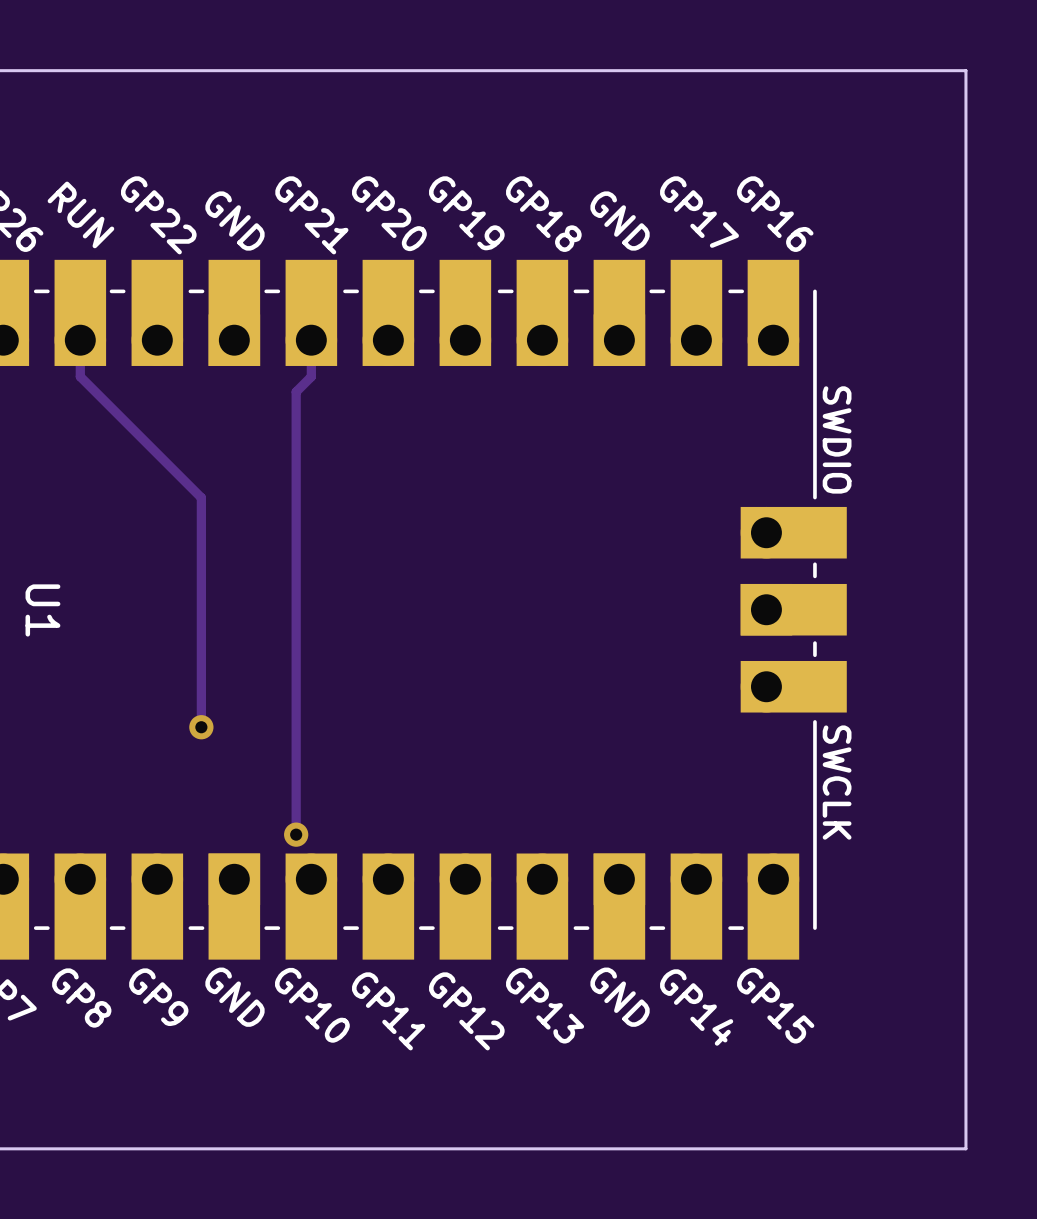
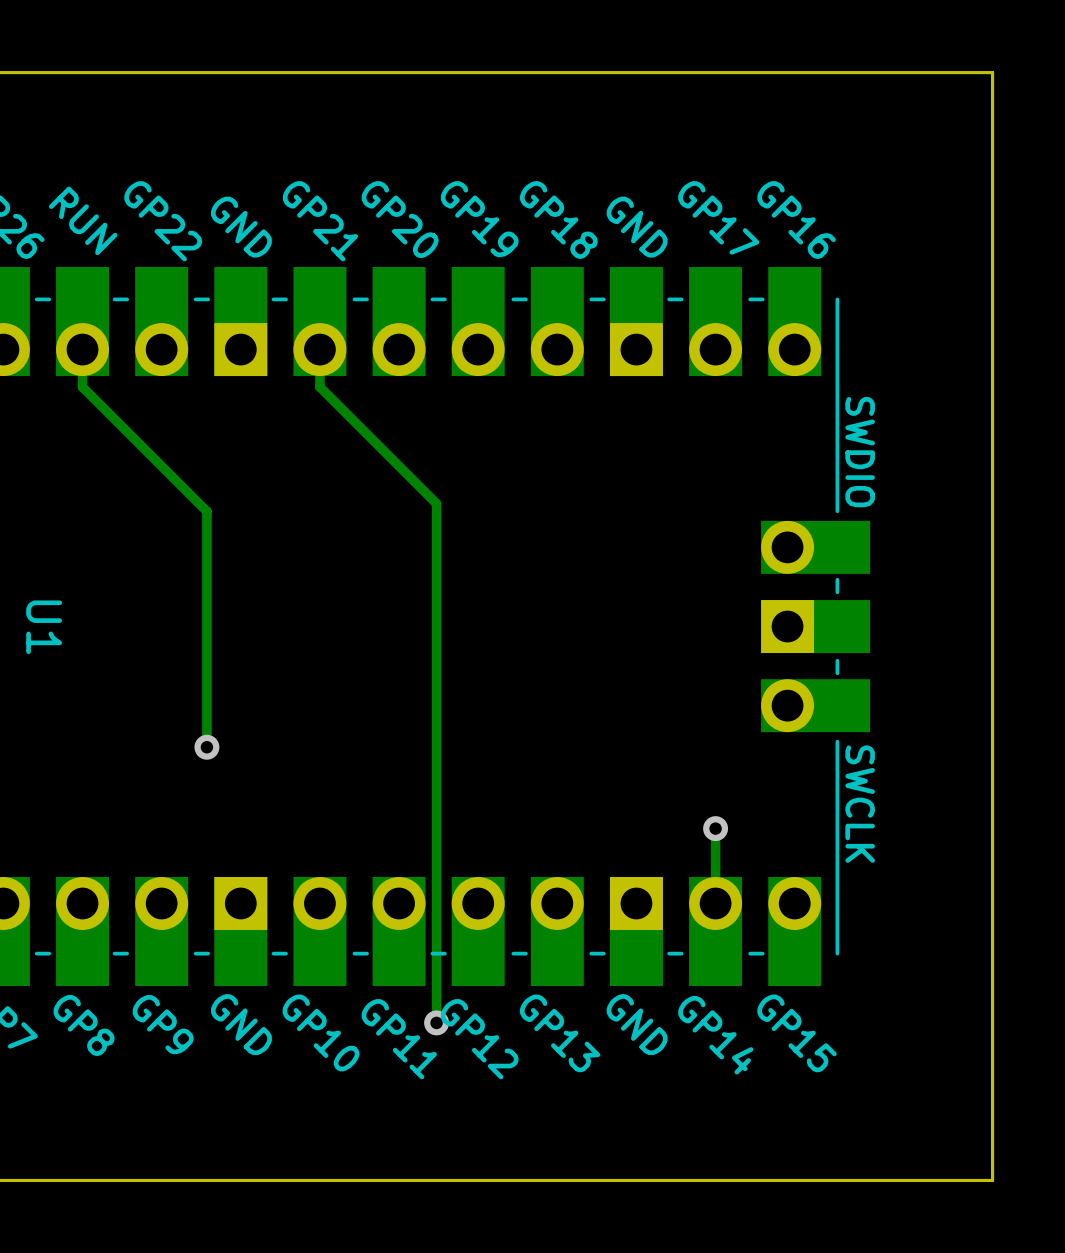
track: (311, 376) (296, 391) (296, 834) -> (319, 387) (436, 503) (436, 1022)
track: none -> (715, 828) (715, 903)
via: none -> (715, 828)
via: (296, 834) -> none
via: none -> (436, 1022)

